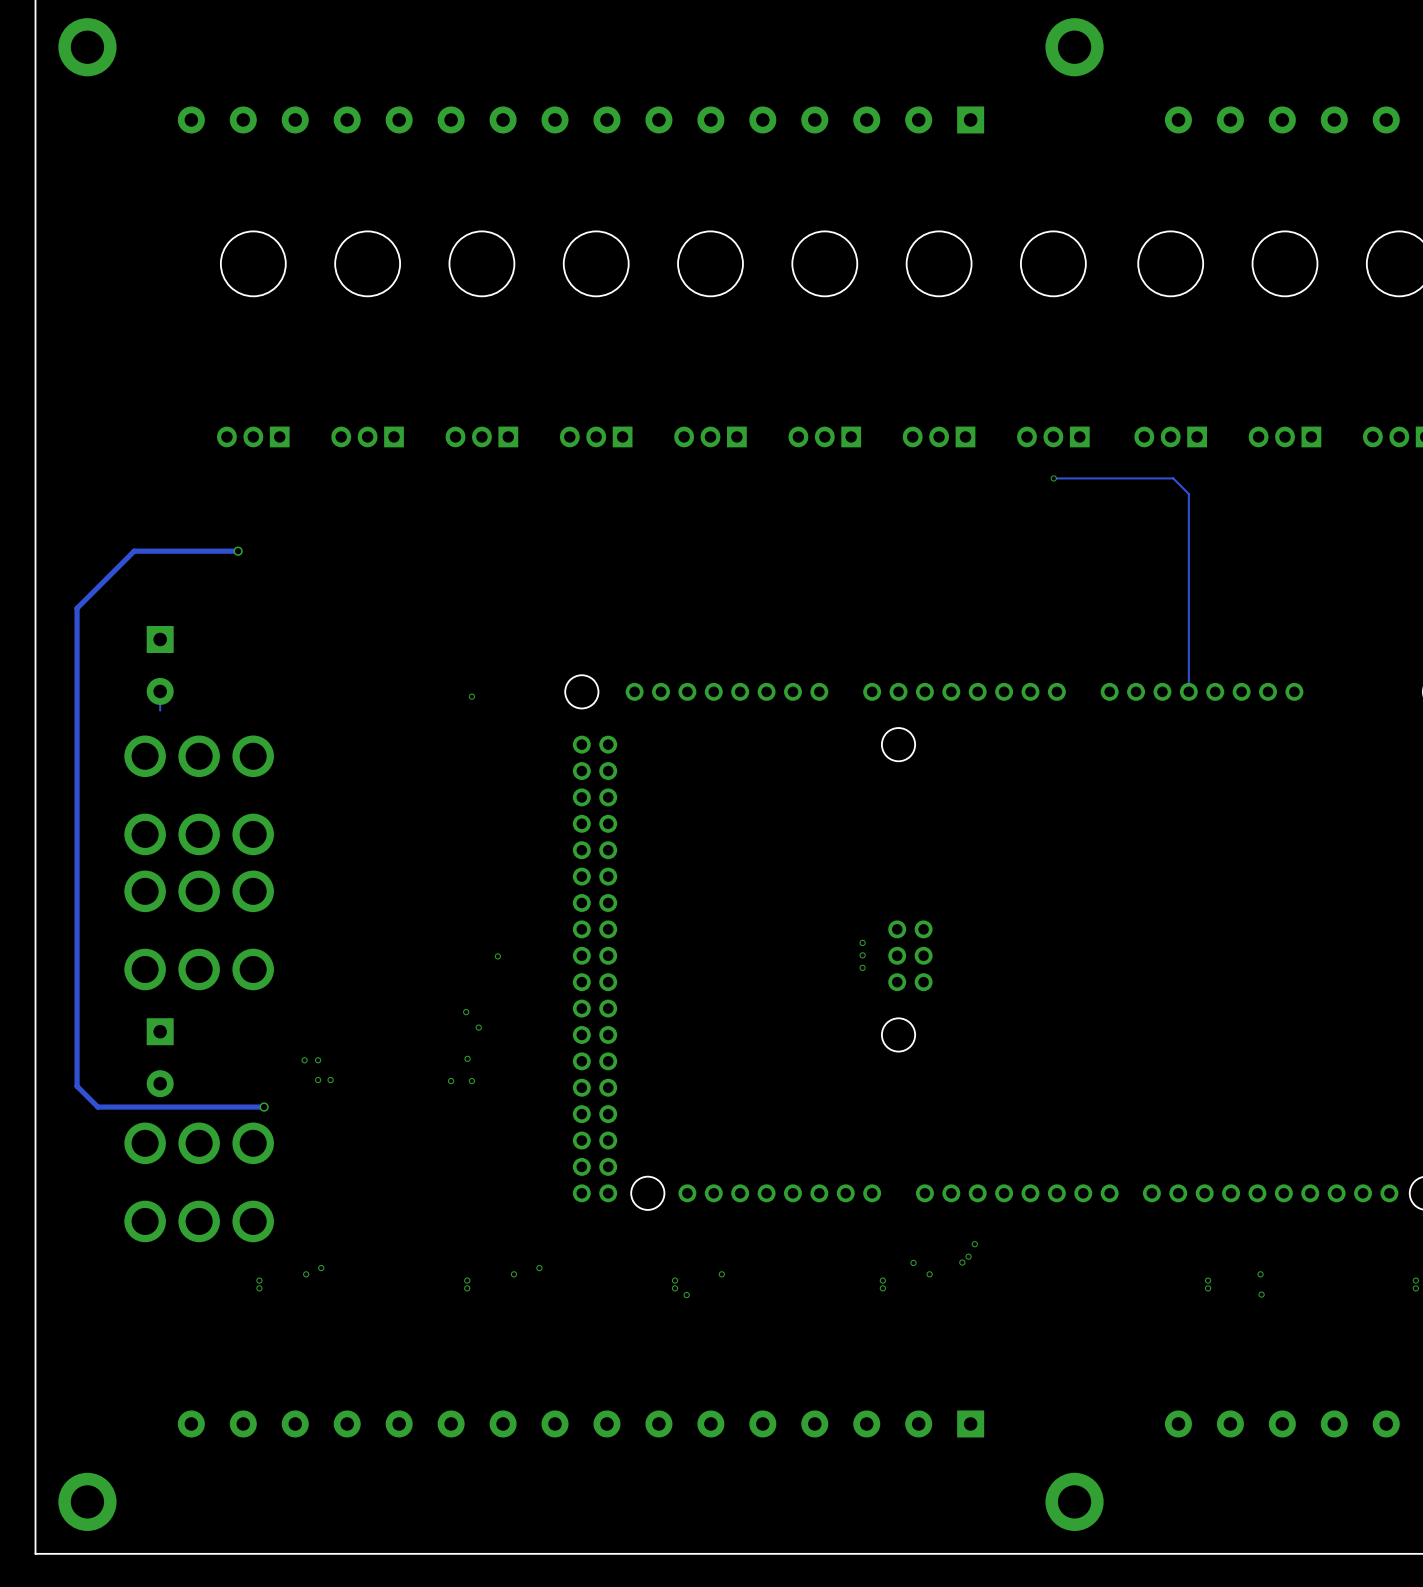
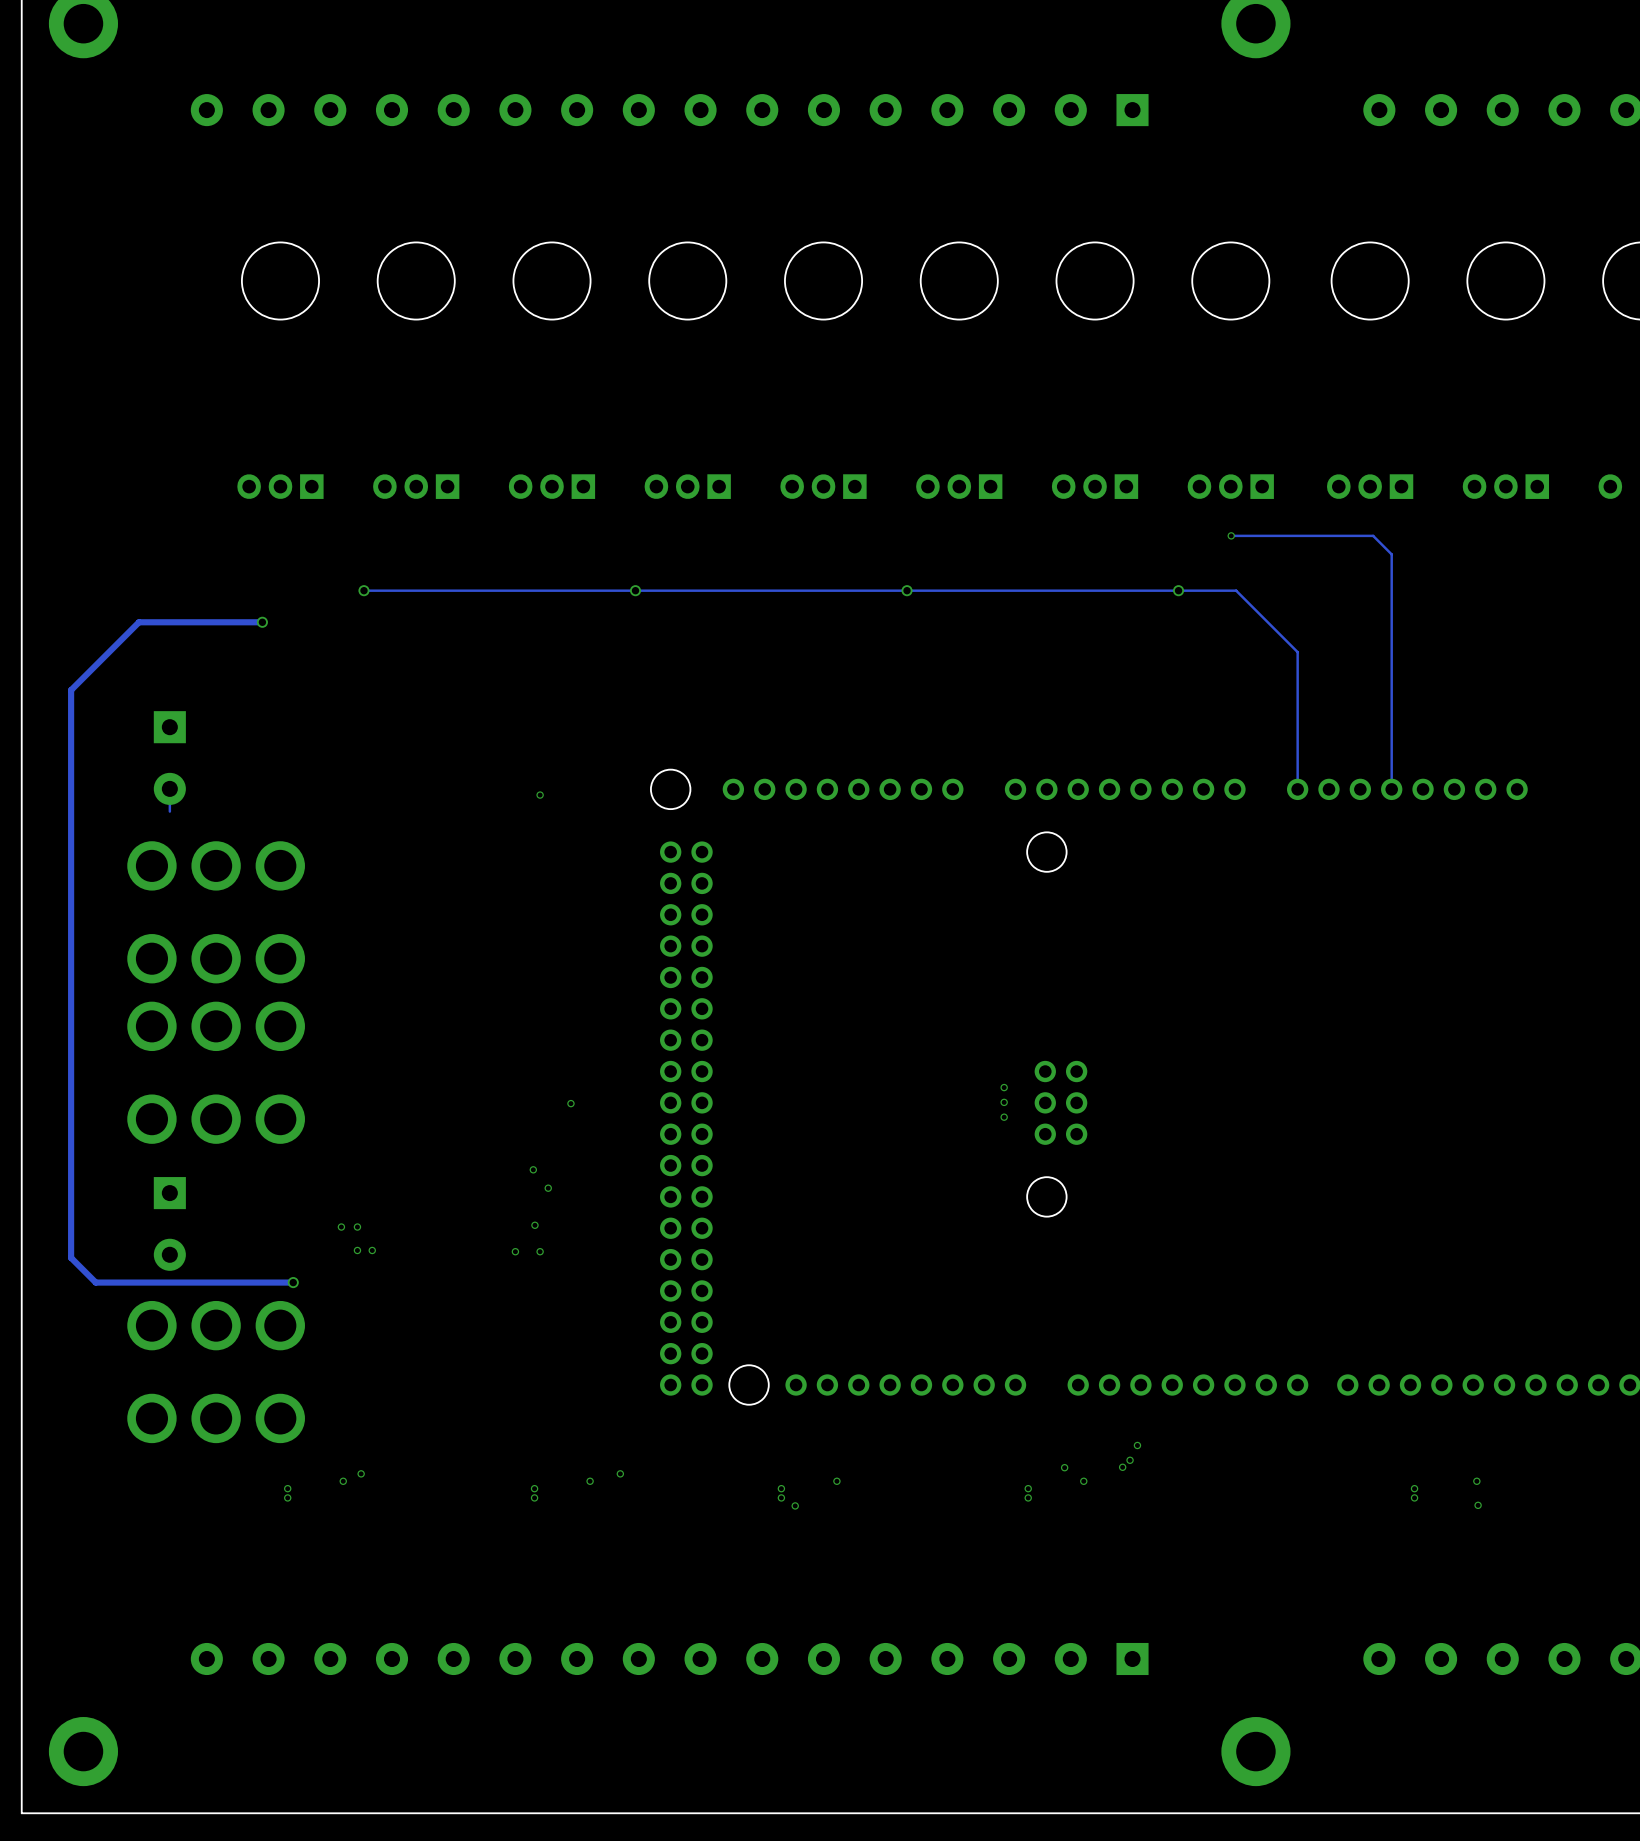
track: none -> (363, 590) (1236, 590) (1297, 652) (1297, 789)
via: none -> (363, 590)
via: none -> (635, 590)
via: none -> (907, 590)
via: none -> (1178, 590)

